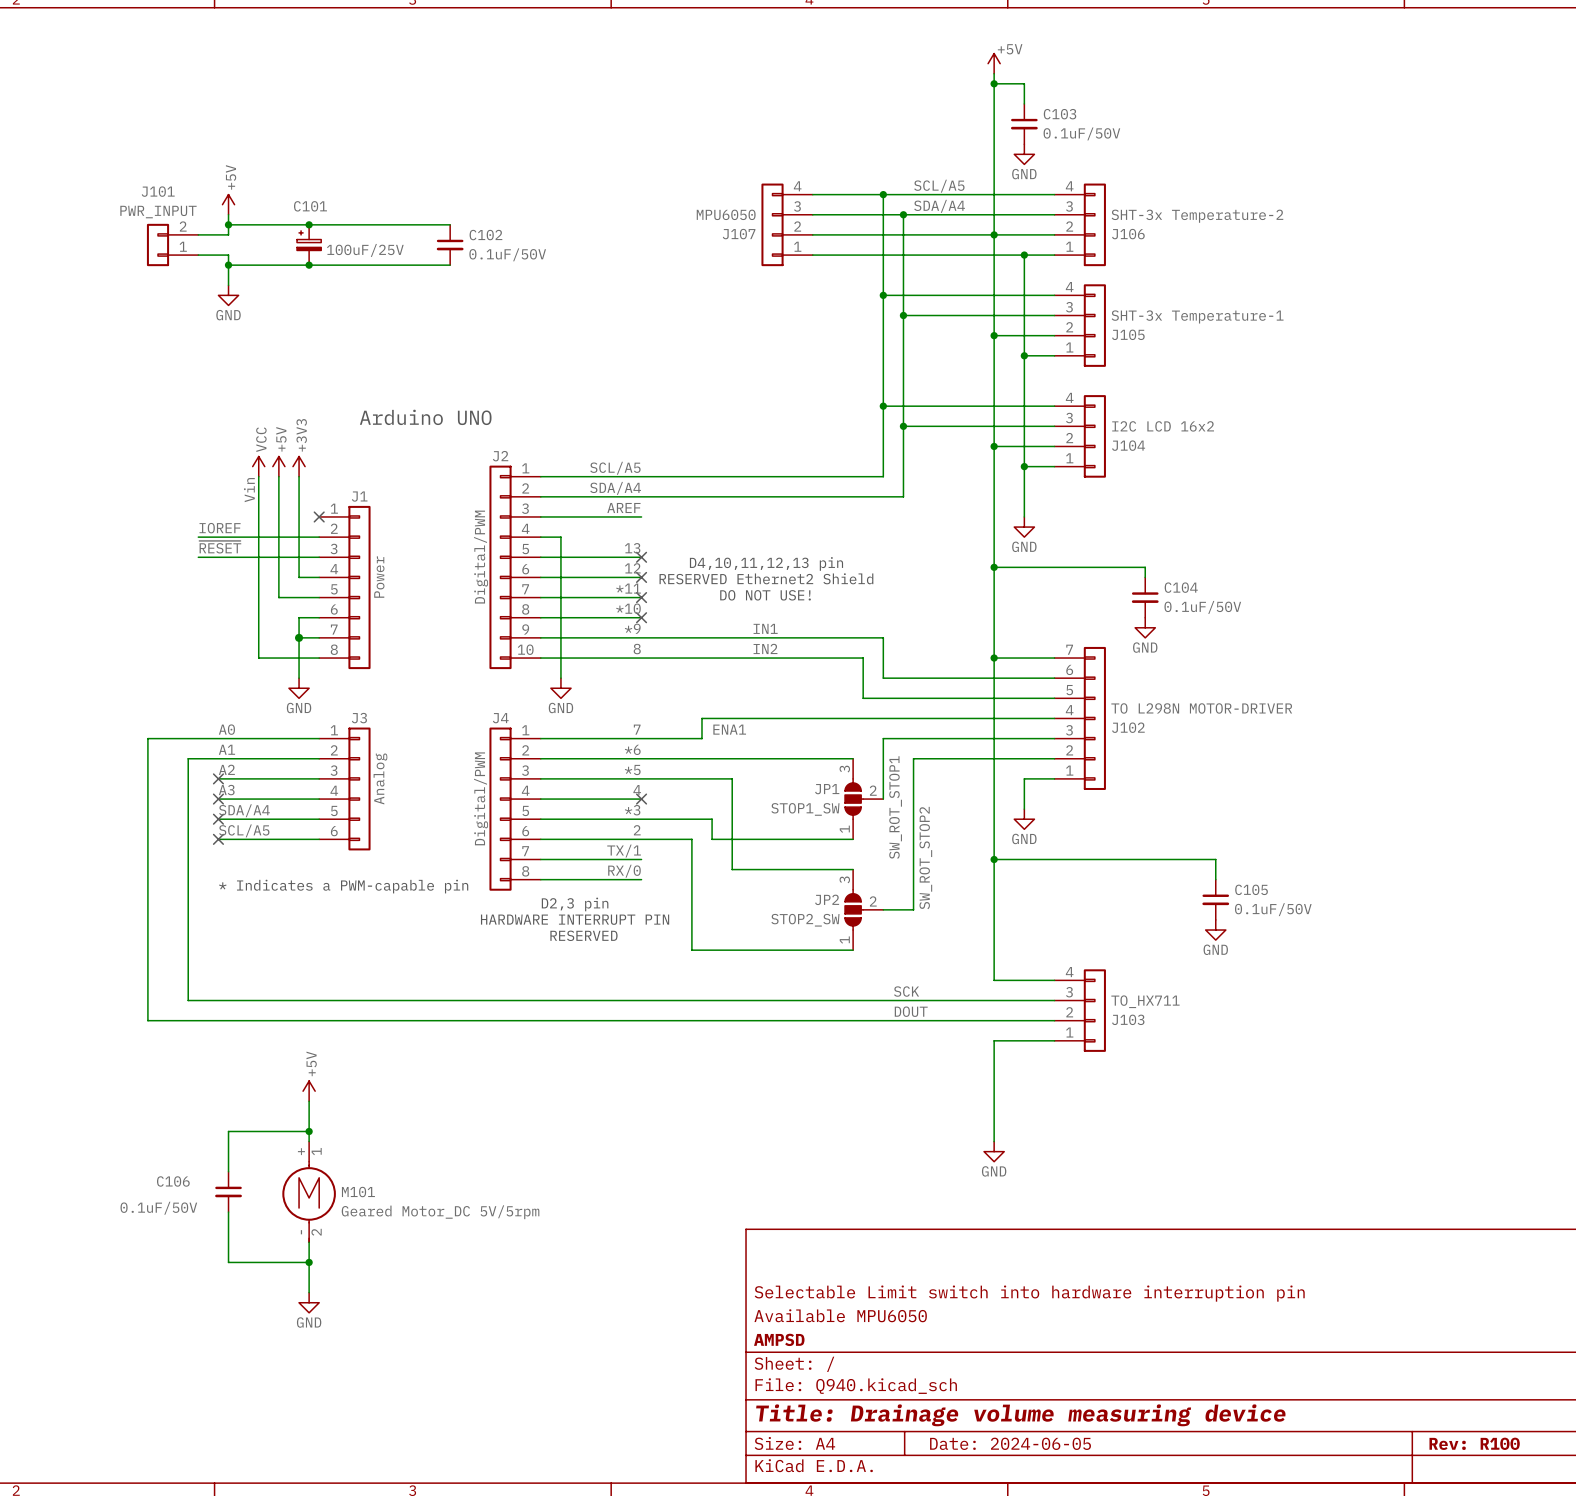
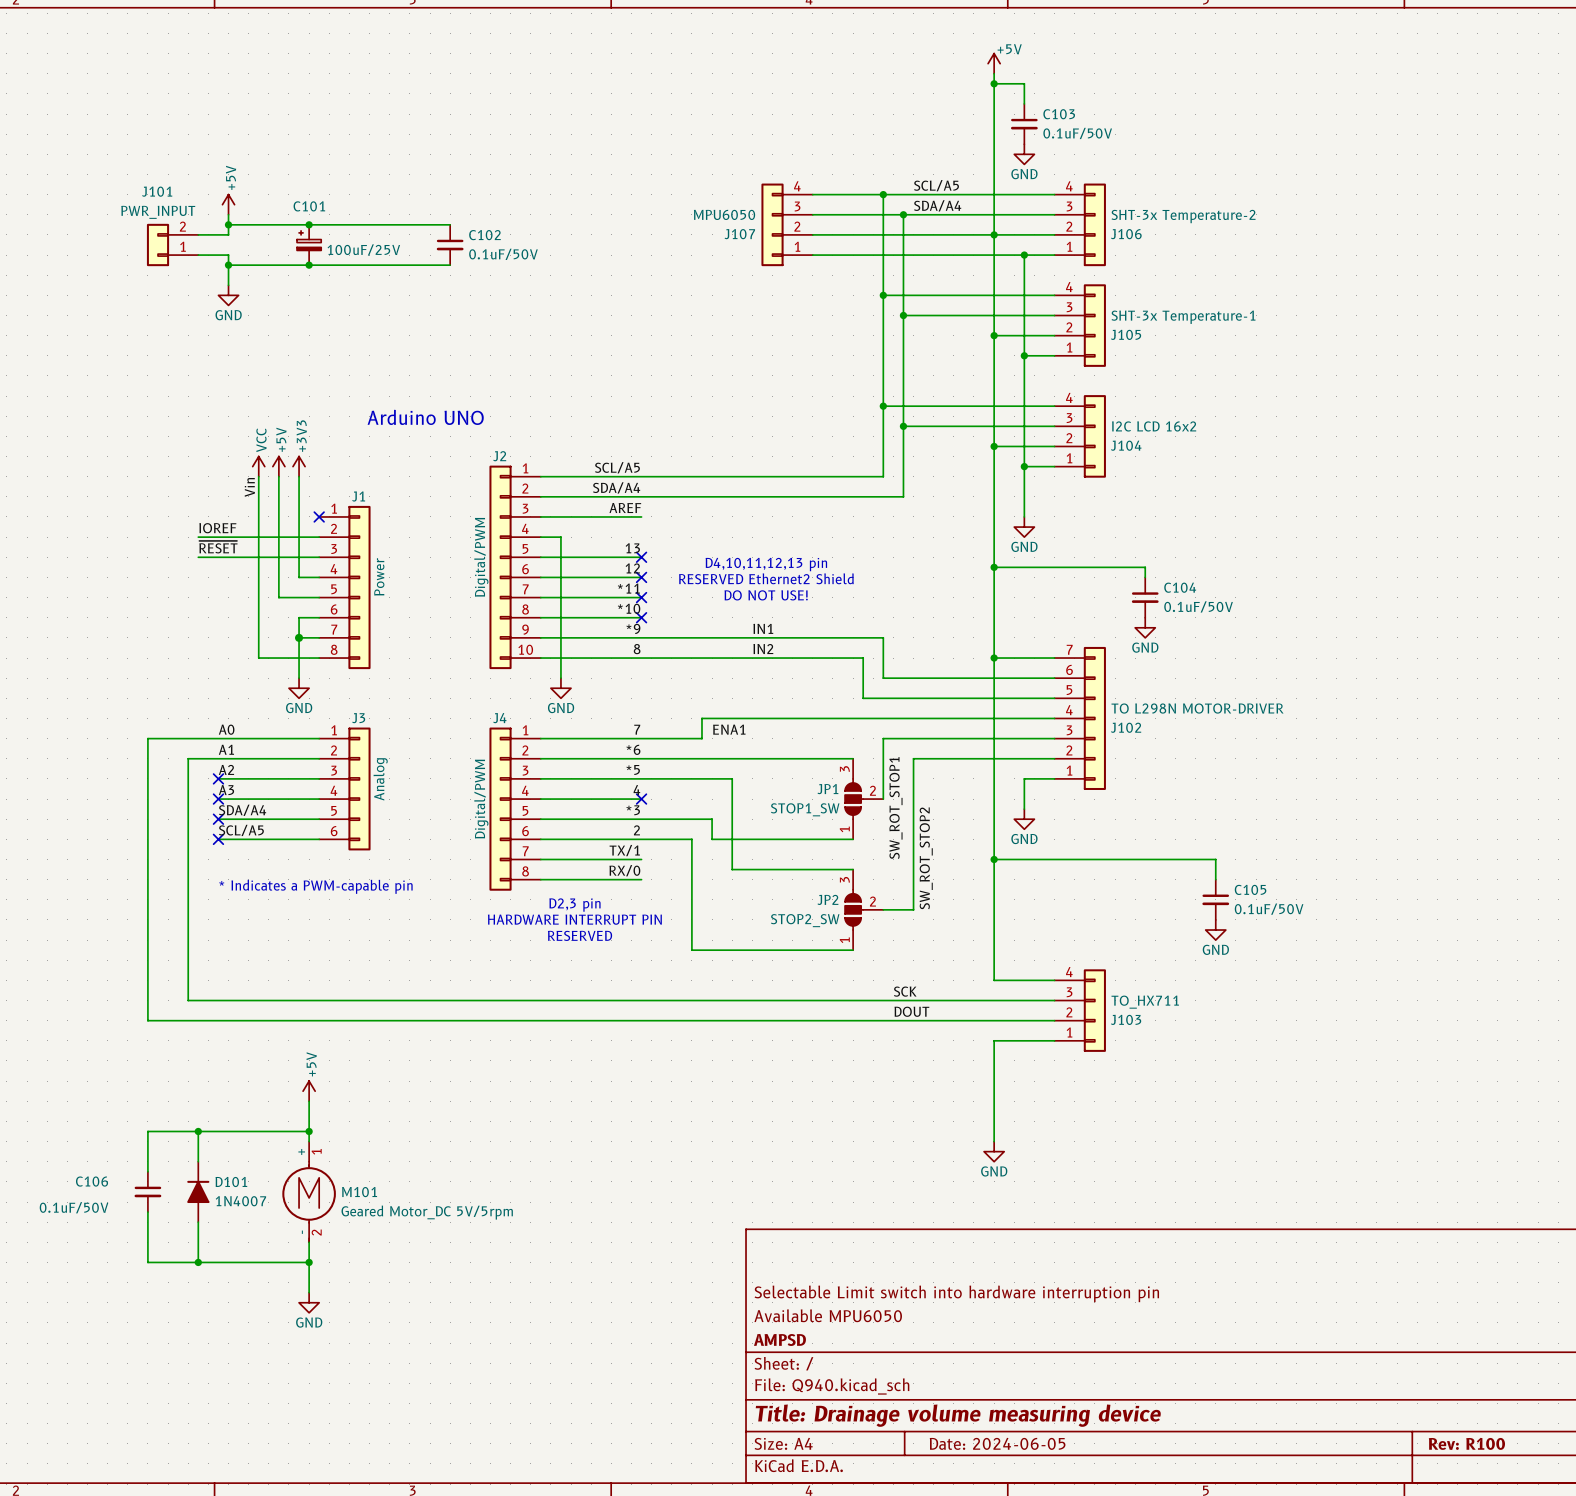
wire: none -> (198, 1131) (198, 1161)
junction: none -> (198, 1131)
wire: (228, 1131) (228, 1171) -> (228, 1131) (147, 1131) (147, 1171)
D101: none -> 1N4007 (198, 1191)
C106 position: (228, 1191) -> (147, 1191)
wire: (228, 1212) (228, 1262) -> (147, 1212) (147, 1262) (228, 1262)
wire: none -> (198, 1222) (198, 1262)
junction: none -> (198, 1262)

